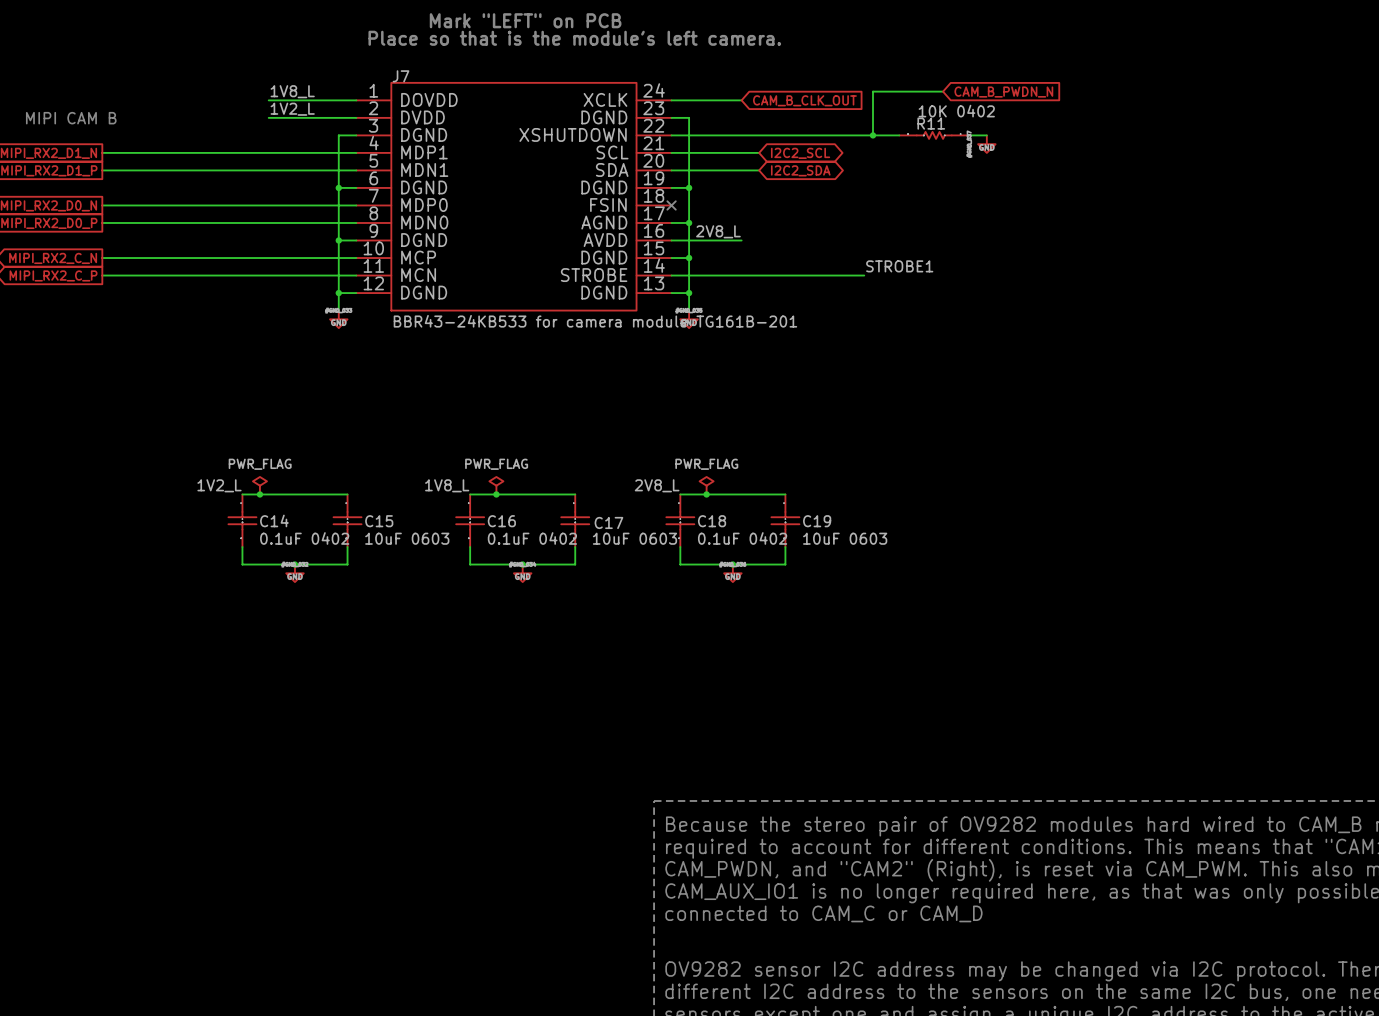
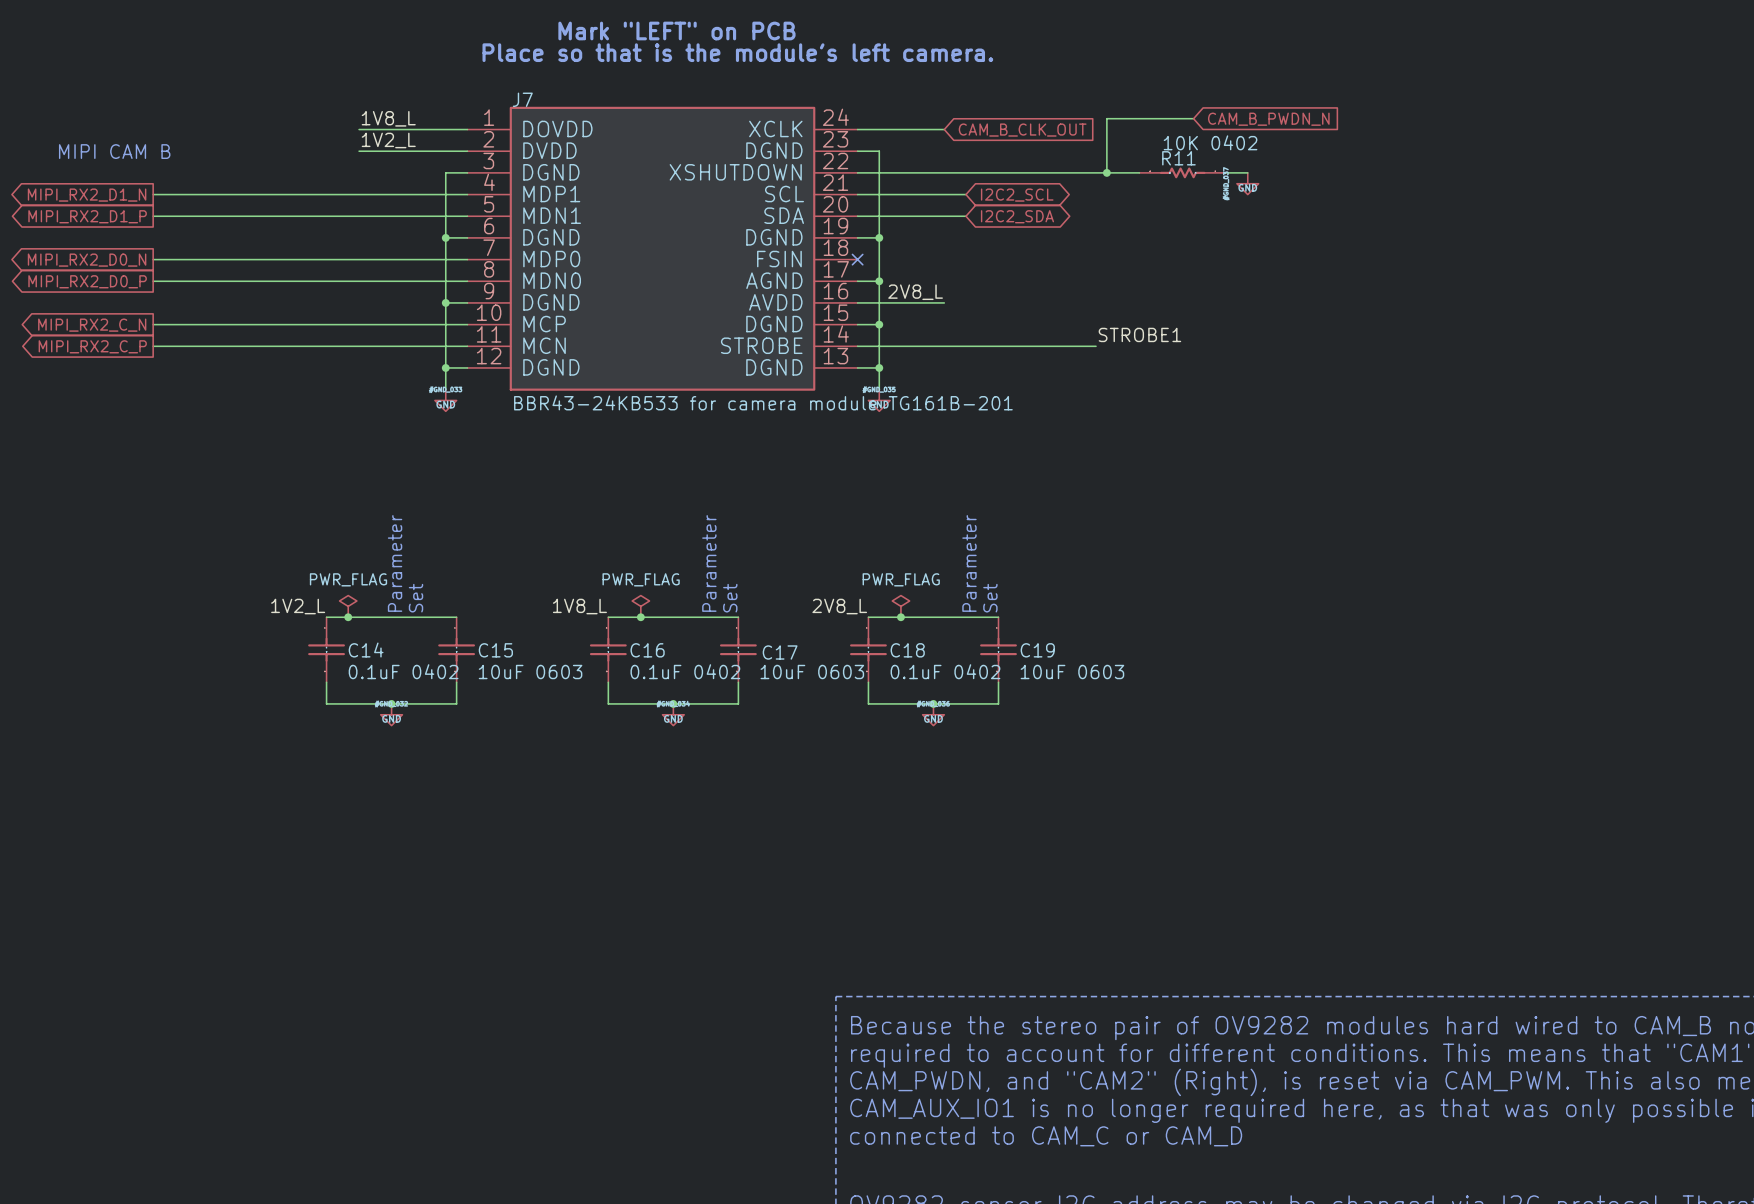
text: none -> Parameter (395, 563)
text: none -> Parameter (709, 563)
text: none -> Parameter (969, 563)
text: none -> Set (416, 598)
text: none -> Set (730, 598)
text: none -> Set (990, 598)

